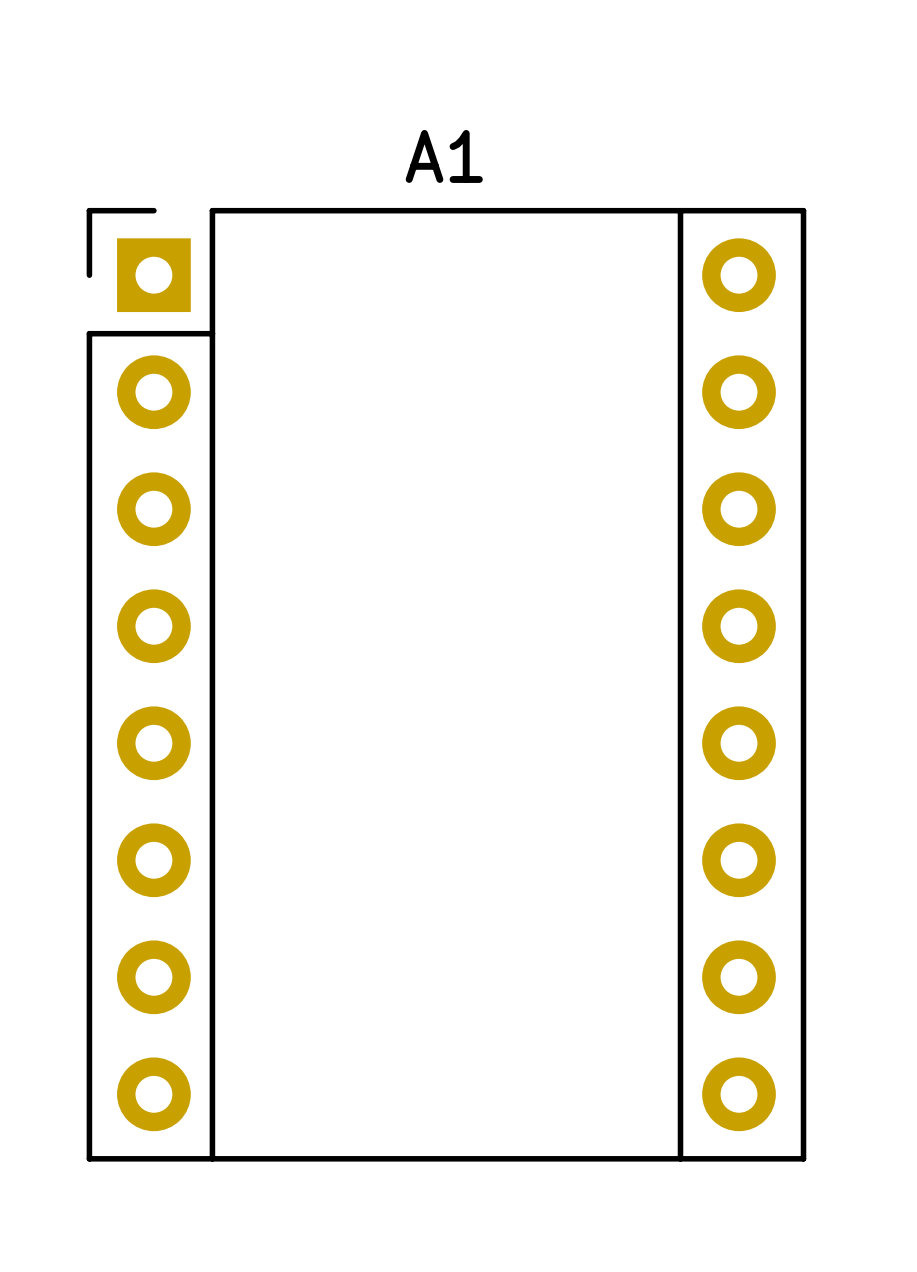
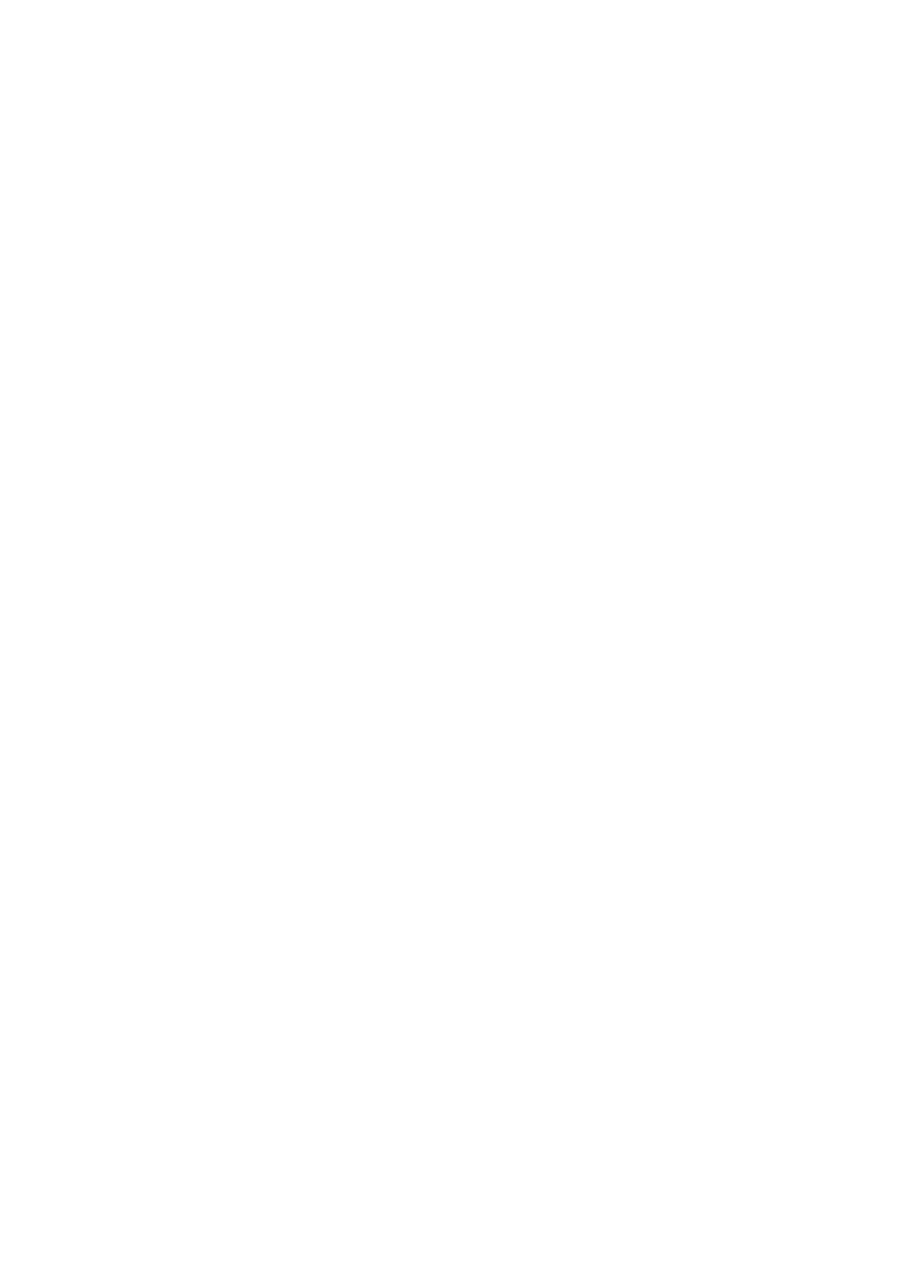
A1: (446, 684) -> none

